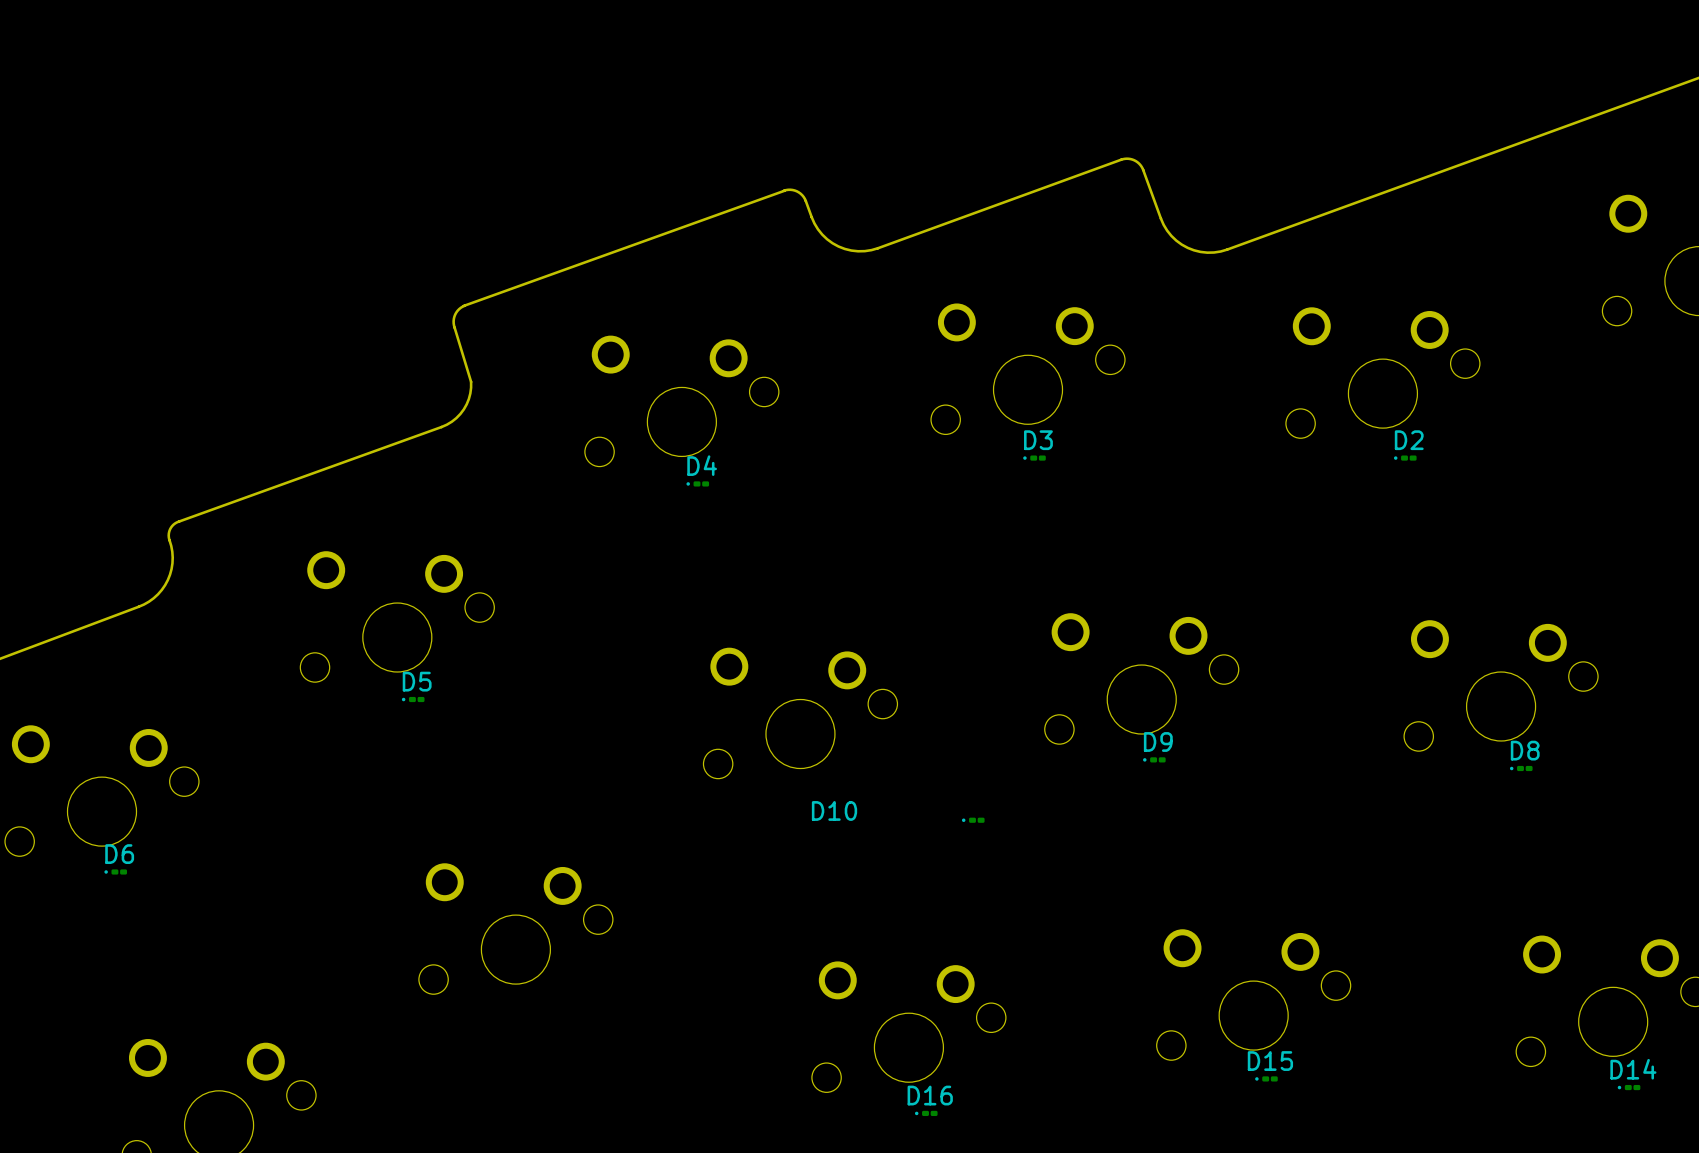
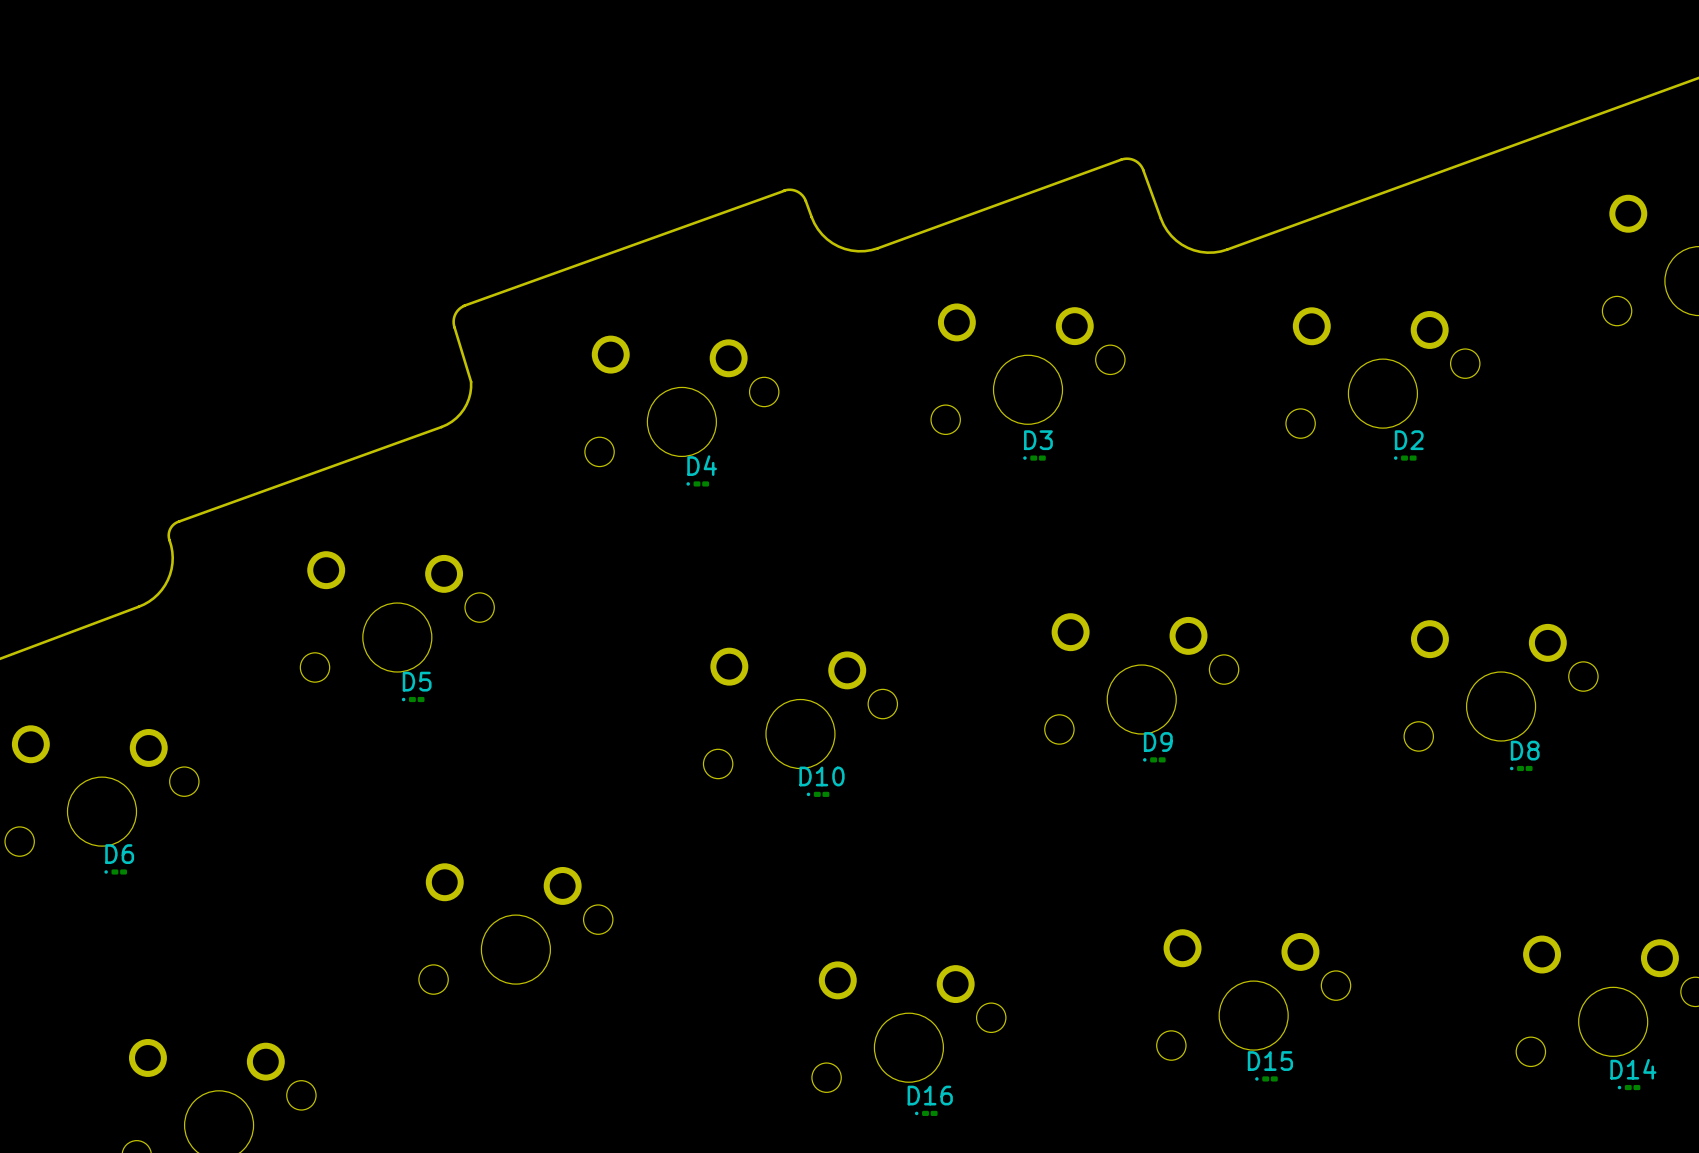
D10 name position: D10 (834, 810) -> D10 (822, 776)
D10 position: (973, 820) -> (818, 794)

